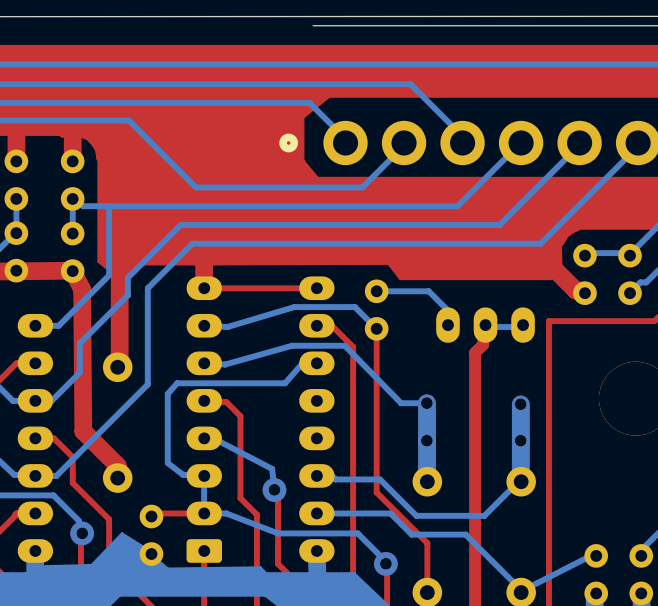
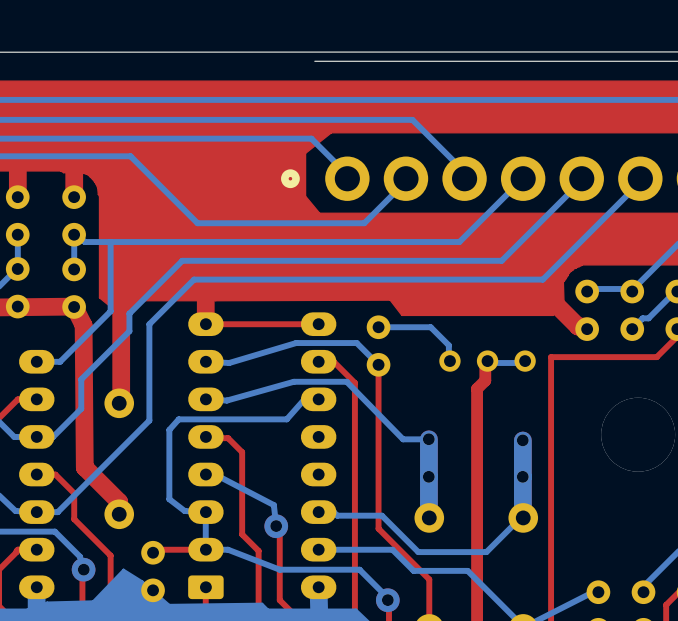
part footprint: [436, 307, 535, 343] -> [439, 350, 536, 372]

